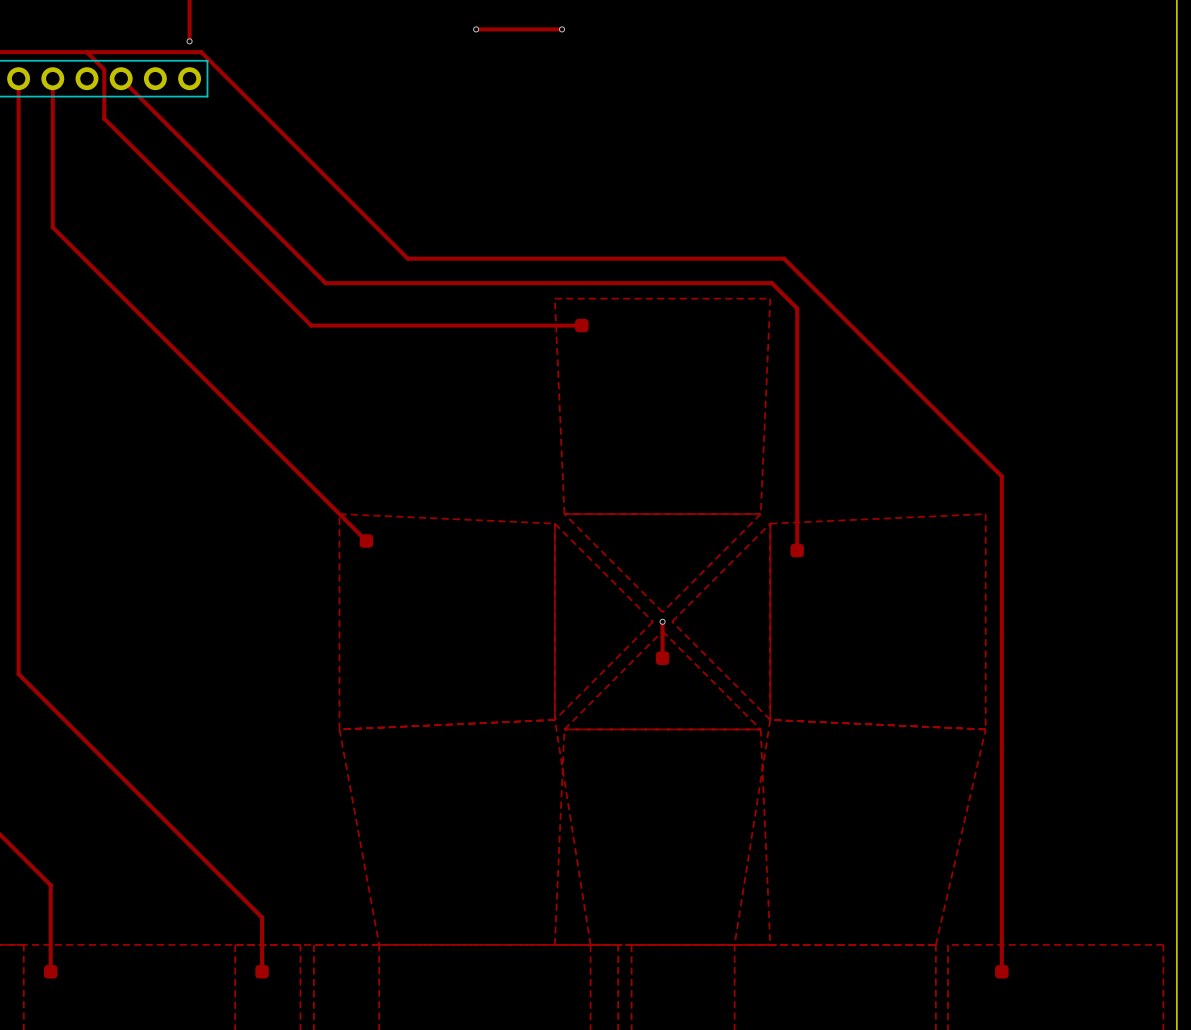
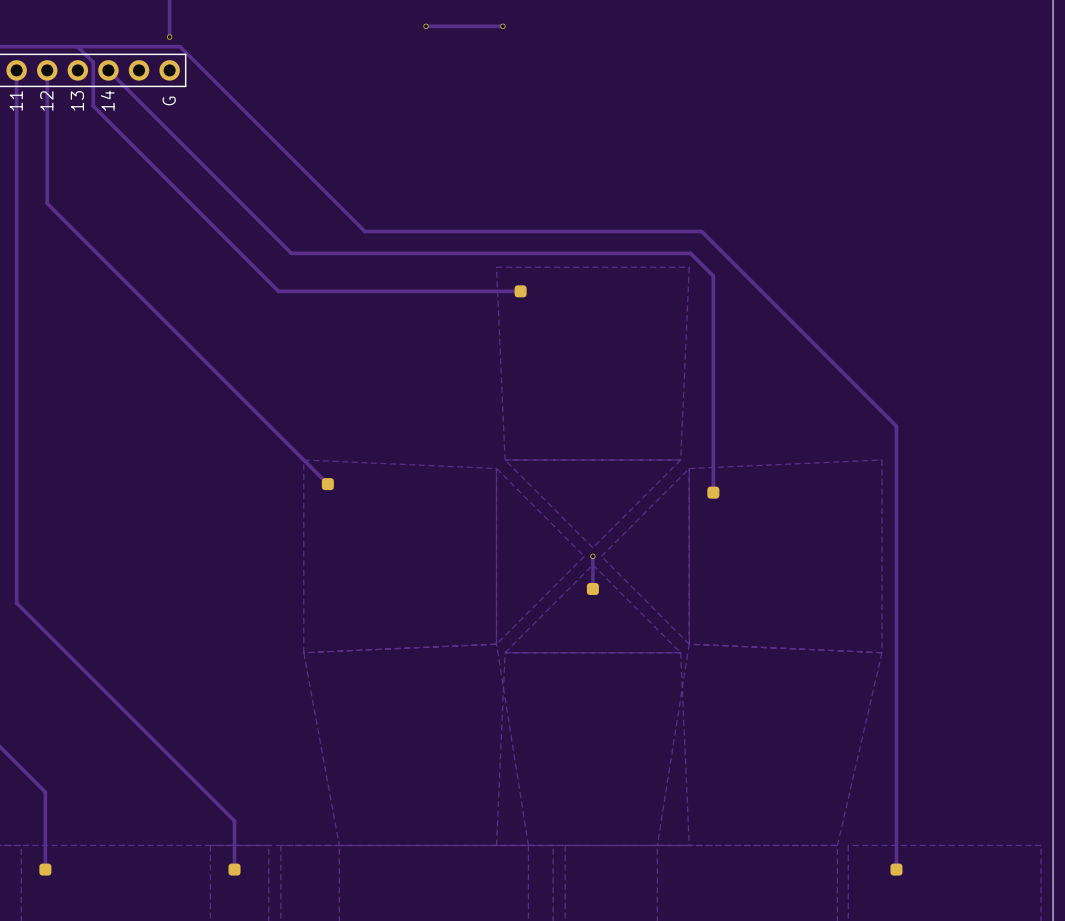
text: none -> 11 (16, 100)
text: none -> 12 (46, 100)
text: none -> 13 (77, 100)
text: none -> 14 (107, 100)
text: none -> G (169, 100)

